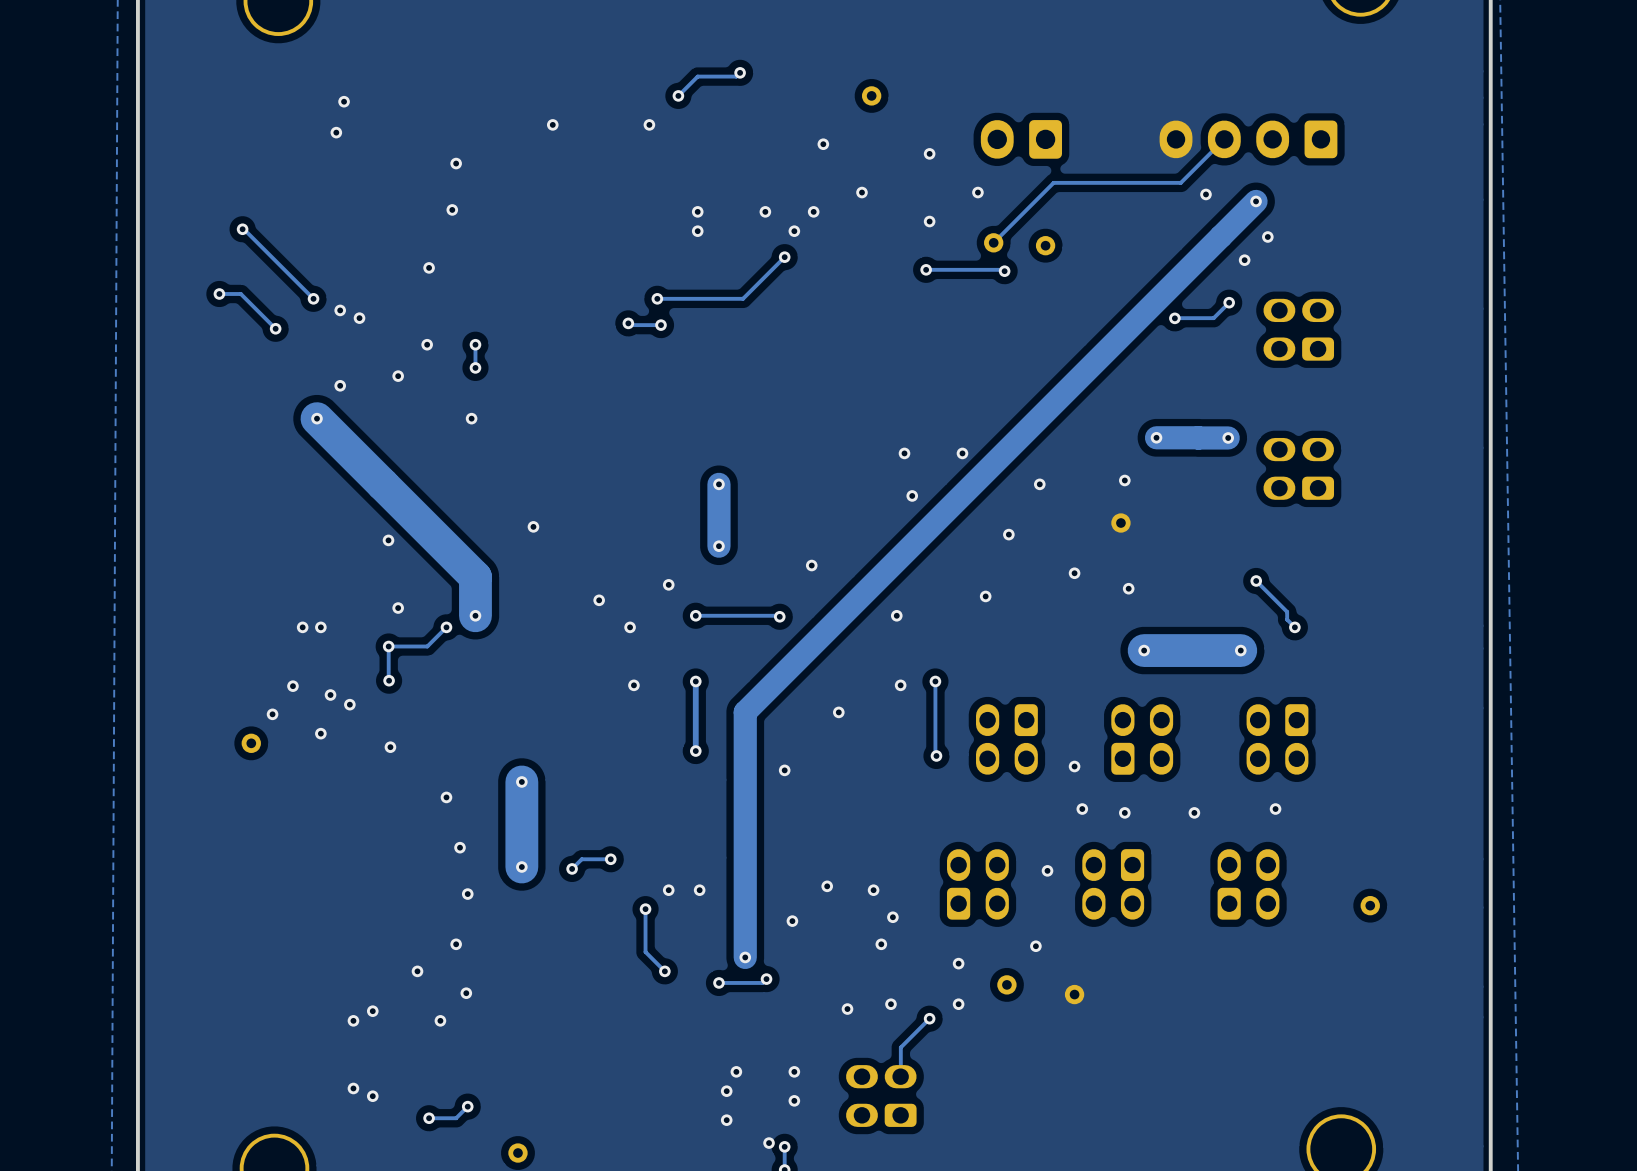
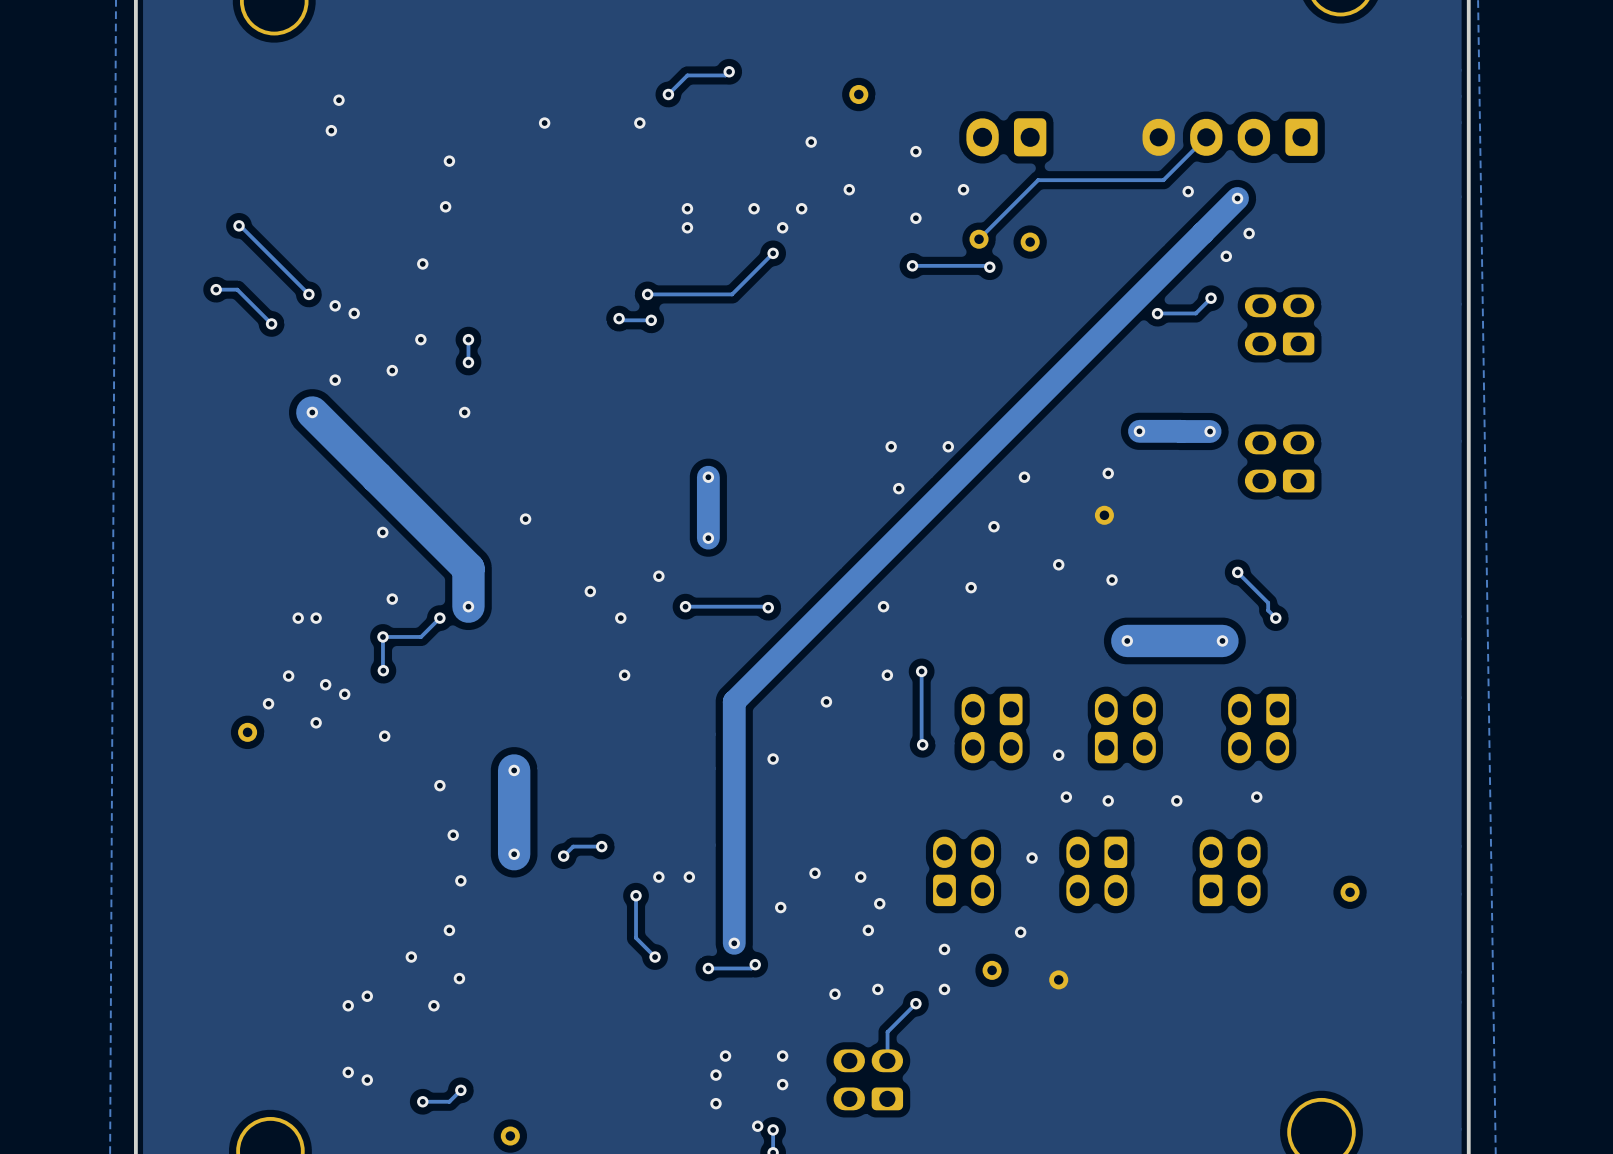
via: (811, 565) -> none
track: (695, 681) (695, 751) -> none
via: (695, 681) -> none
via: (695, 751) -> none

